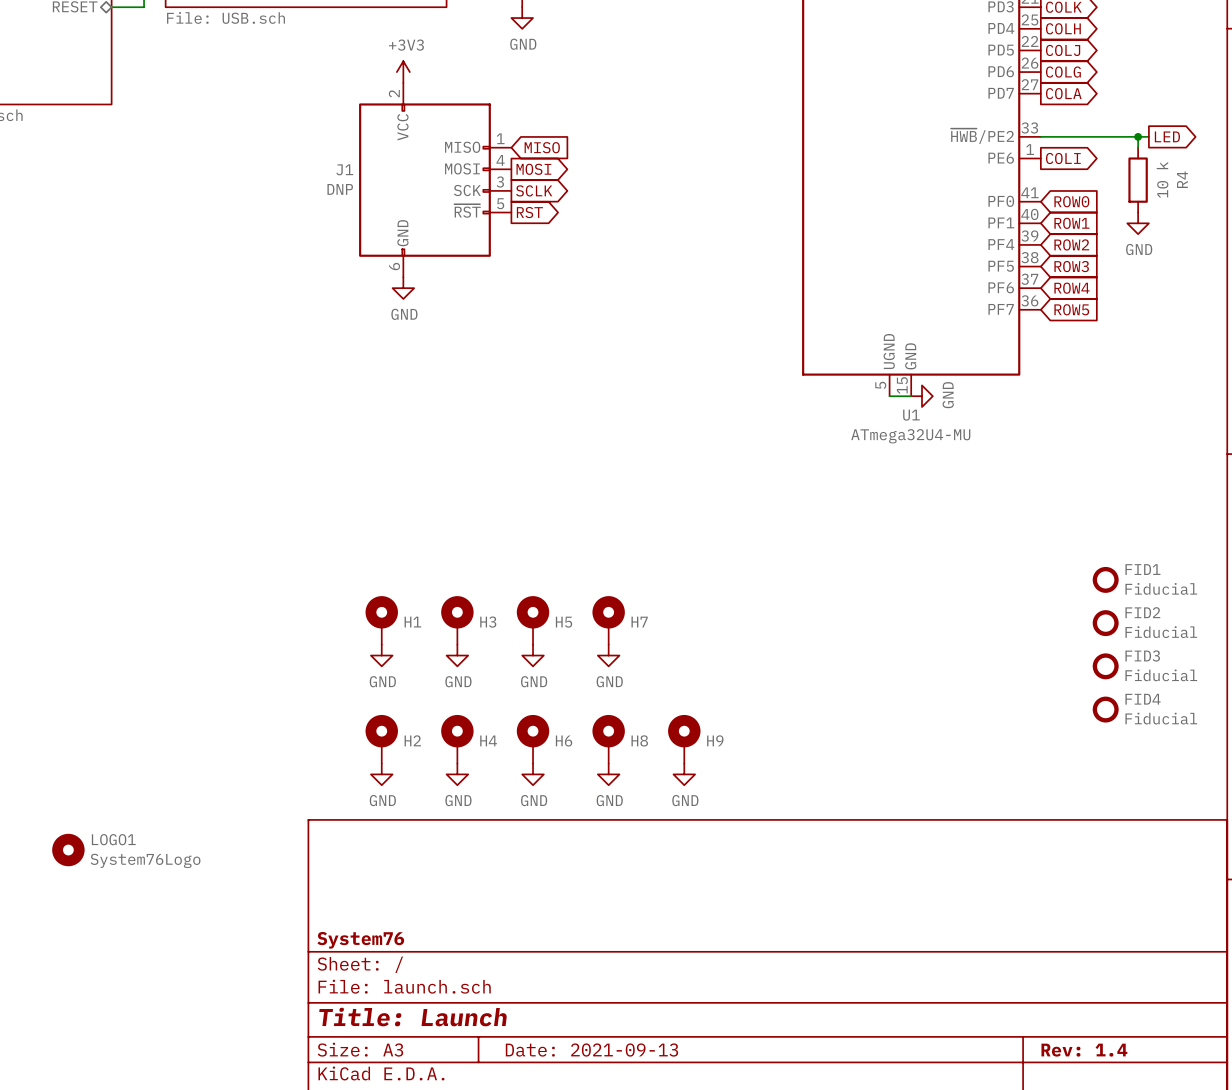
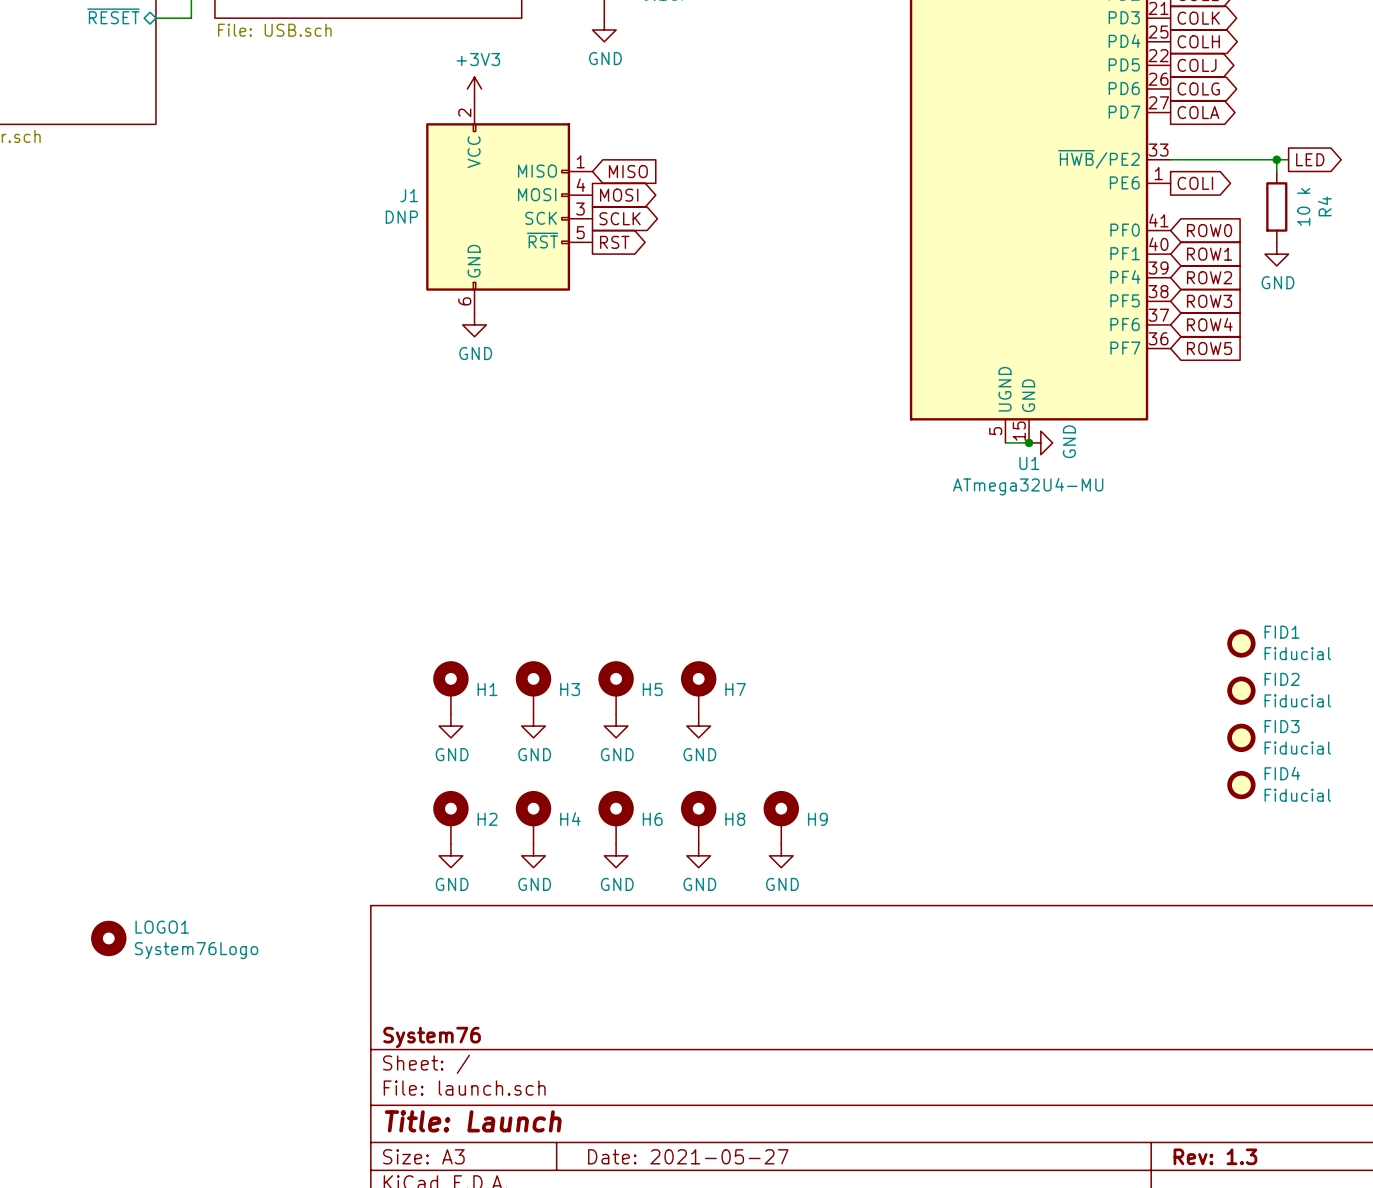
junction: none -> (1029, 442)
title block: Date: 2021-09-13 (591, 1050) -> Date: 2021-05-27 (688, 1156)
title block: Rev: 1.4 (1084, 1050) -> Rev: 1.3 (1215, 1156)

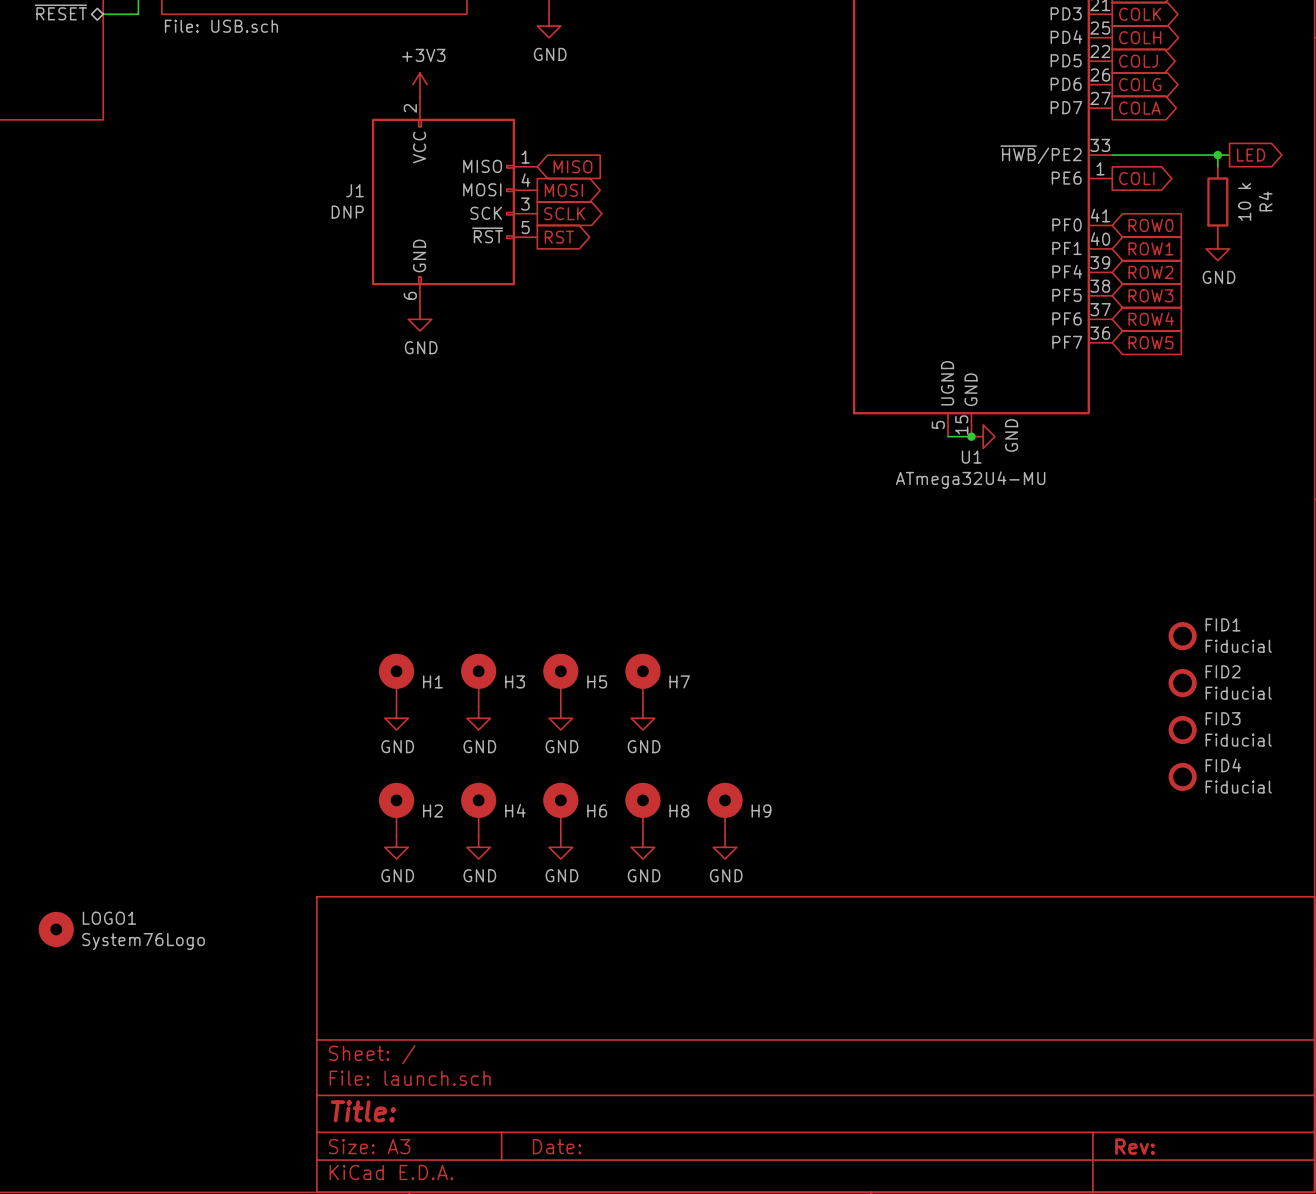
title block: System76 (432, 1037) -> none
title block: Title: Launch (473, 1121) -> Title: (363, 1111)
title block: Date: 2021-05-27 (688, 1156) -> Date: (557, 1146)
title block: Rev: 1.3 (1215, 1156) -> Rev: (1135, 1146)

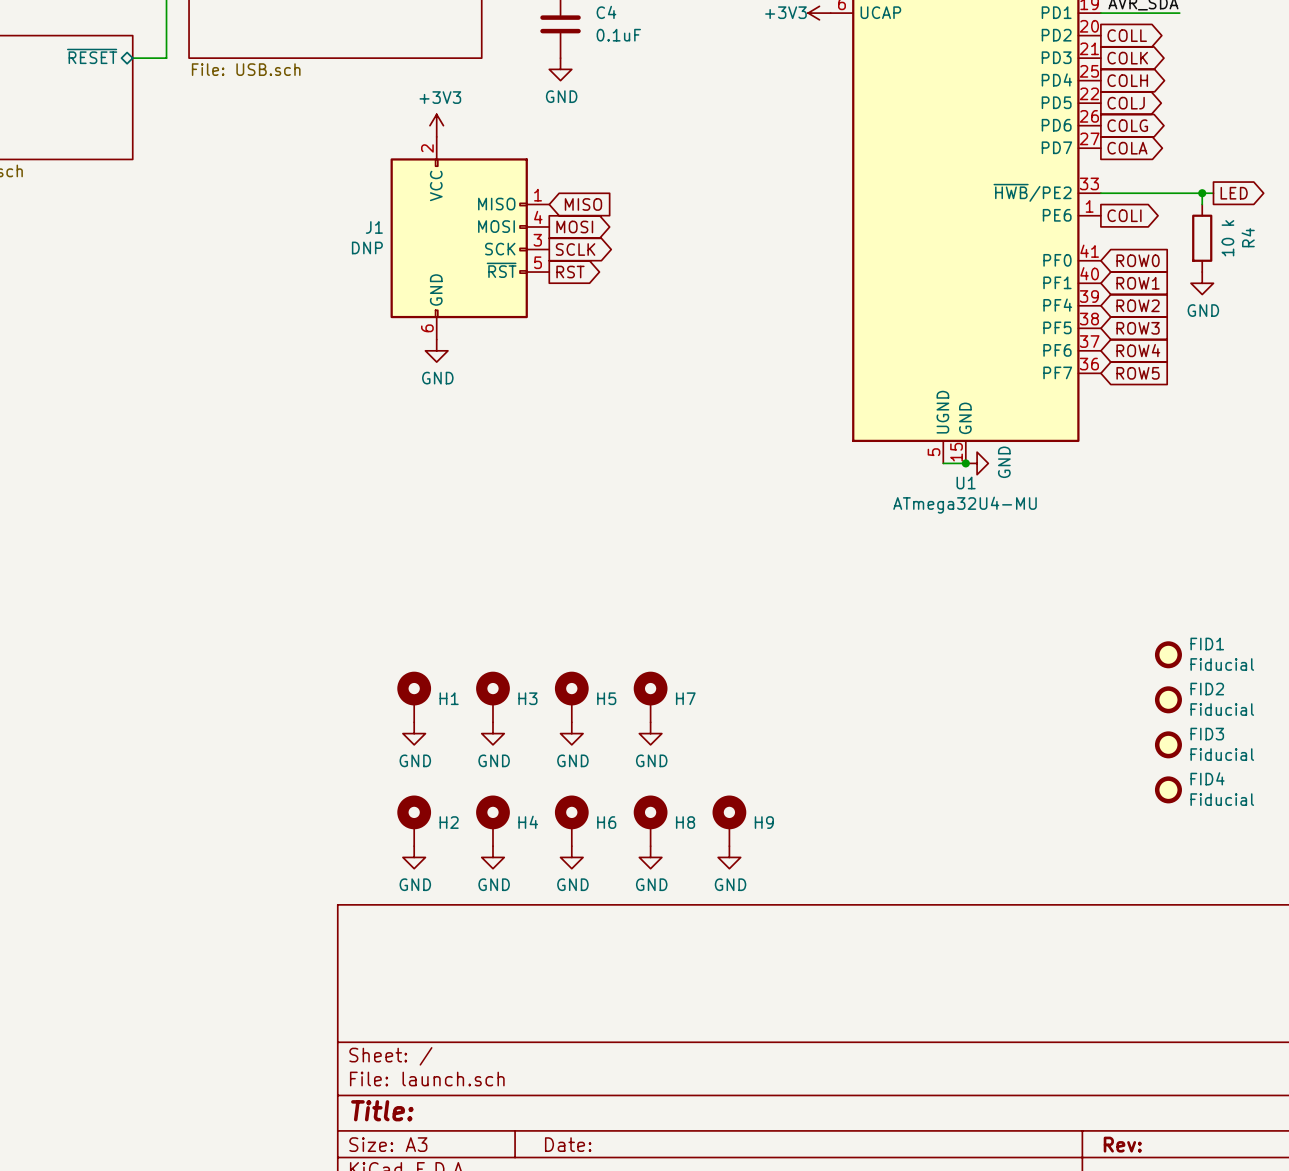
LOGO1: System76Logo (56, 929) -> none

